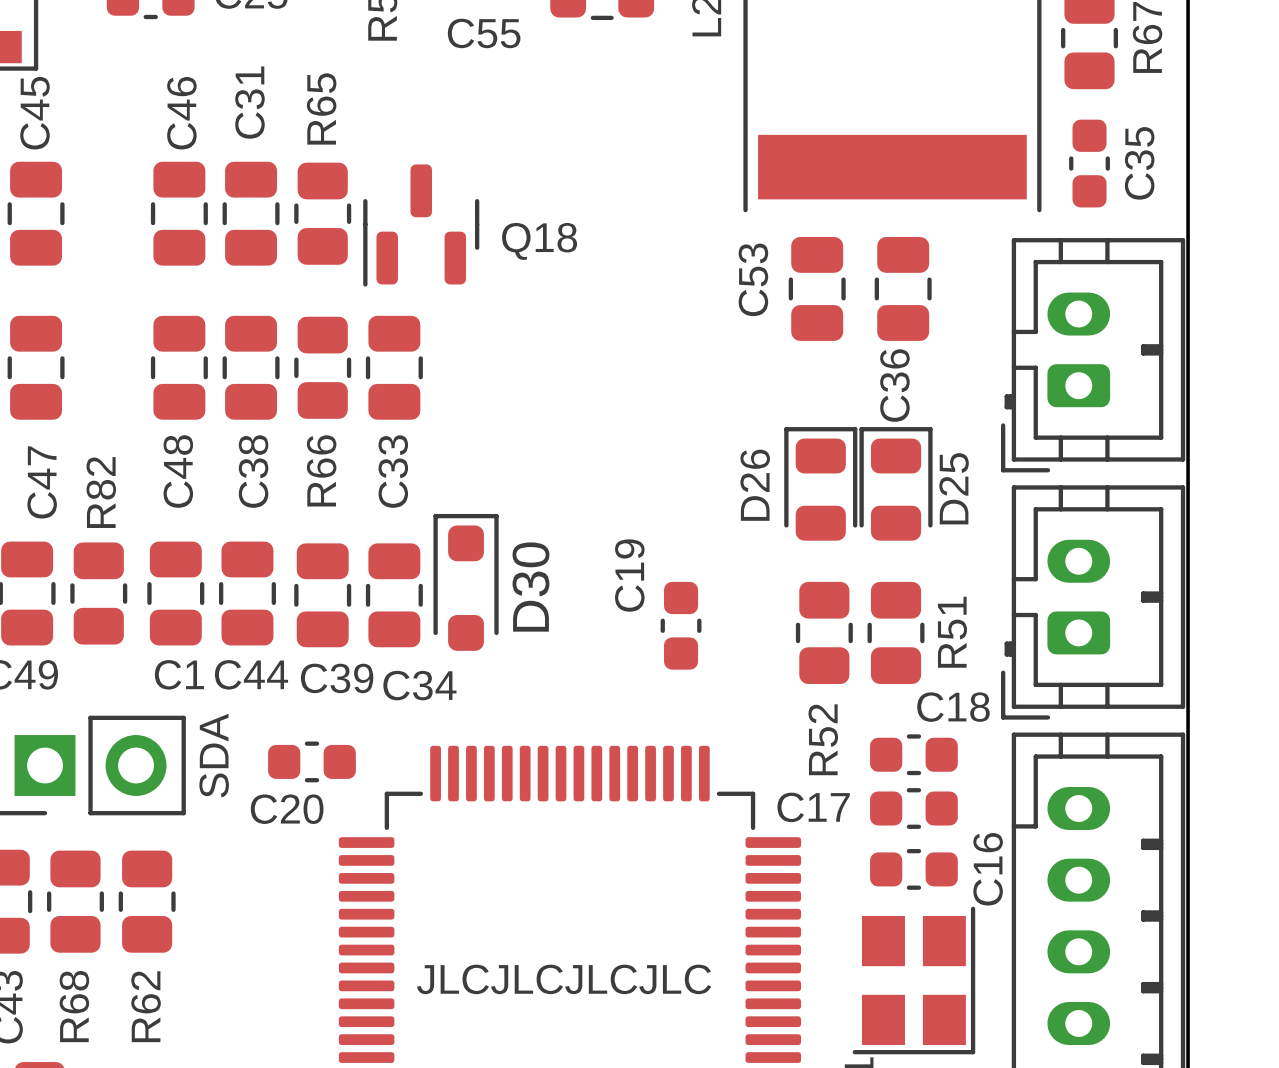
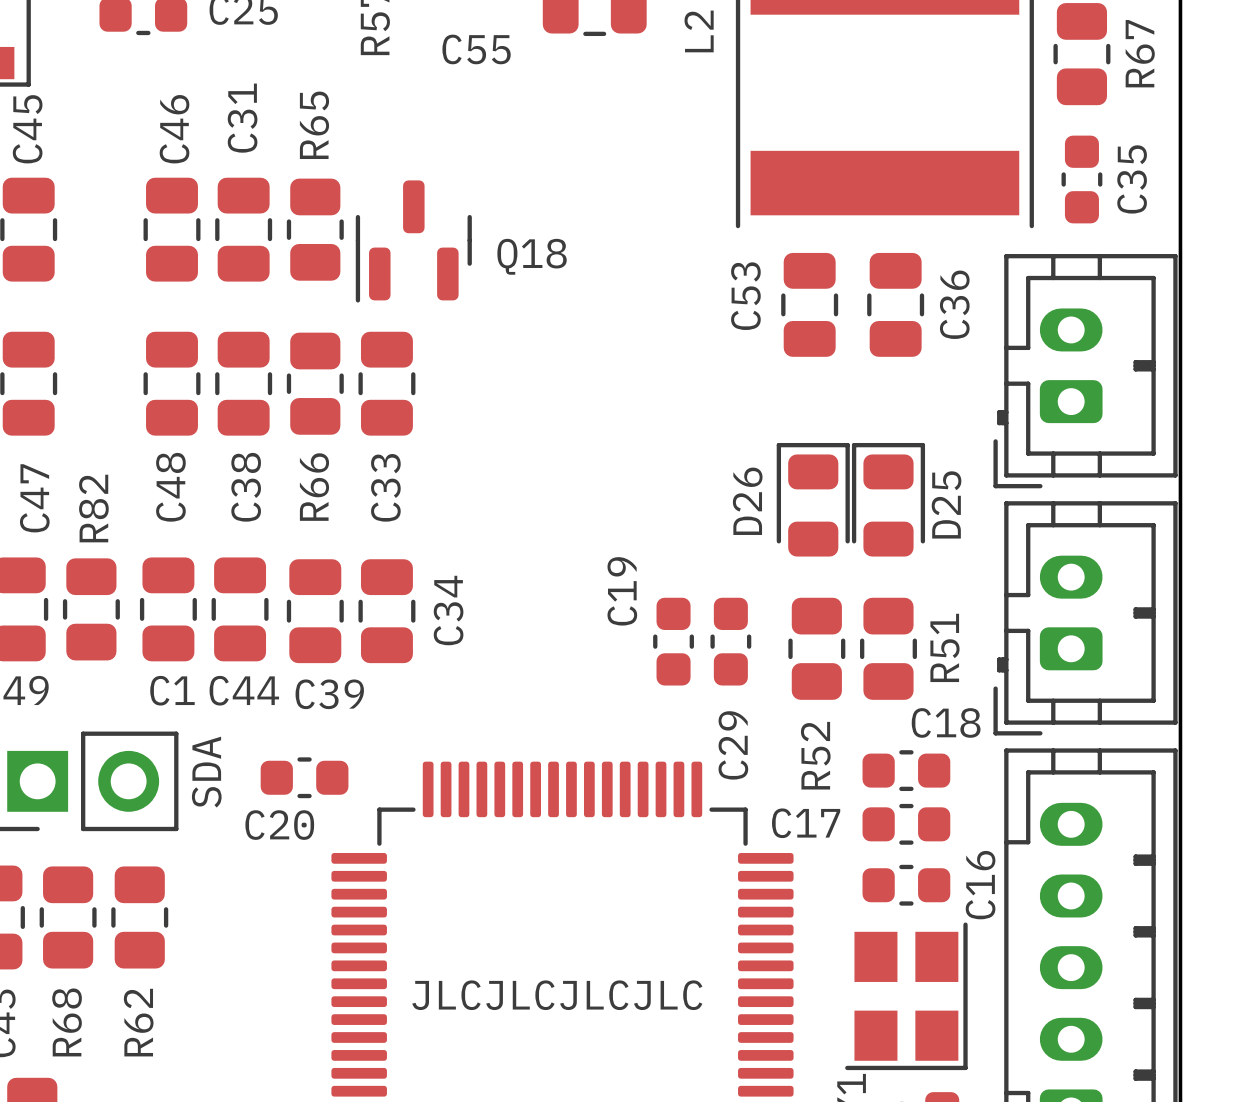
C36 name position: C36 (894, 385) -> C36 (954, 304)
D30: (466, 582) -> none
C29: none -> (730, 641)
C34 name rotation: 0° (419, 685) -> 90° counterclockwise (448, 610)

